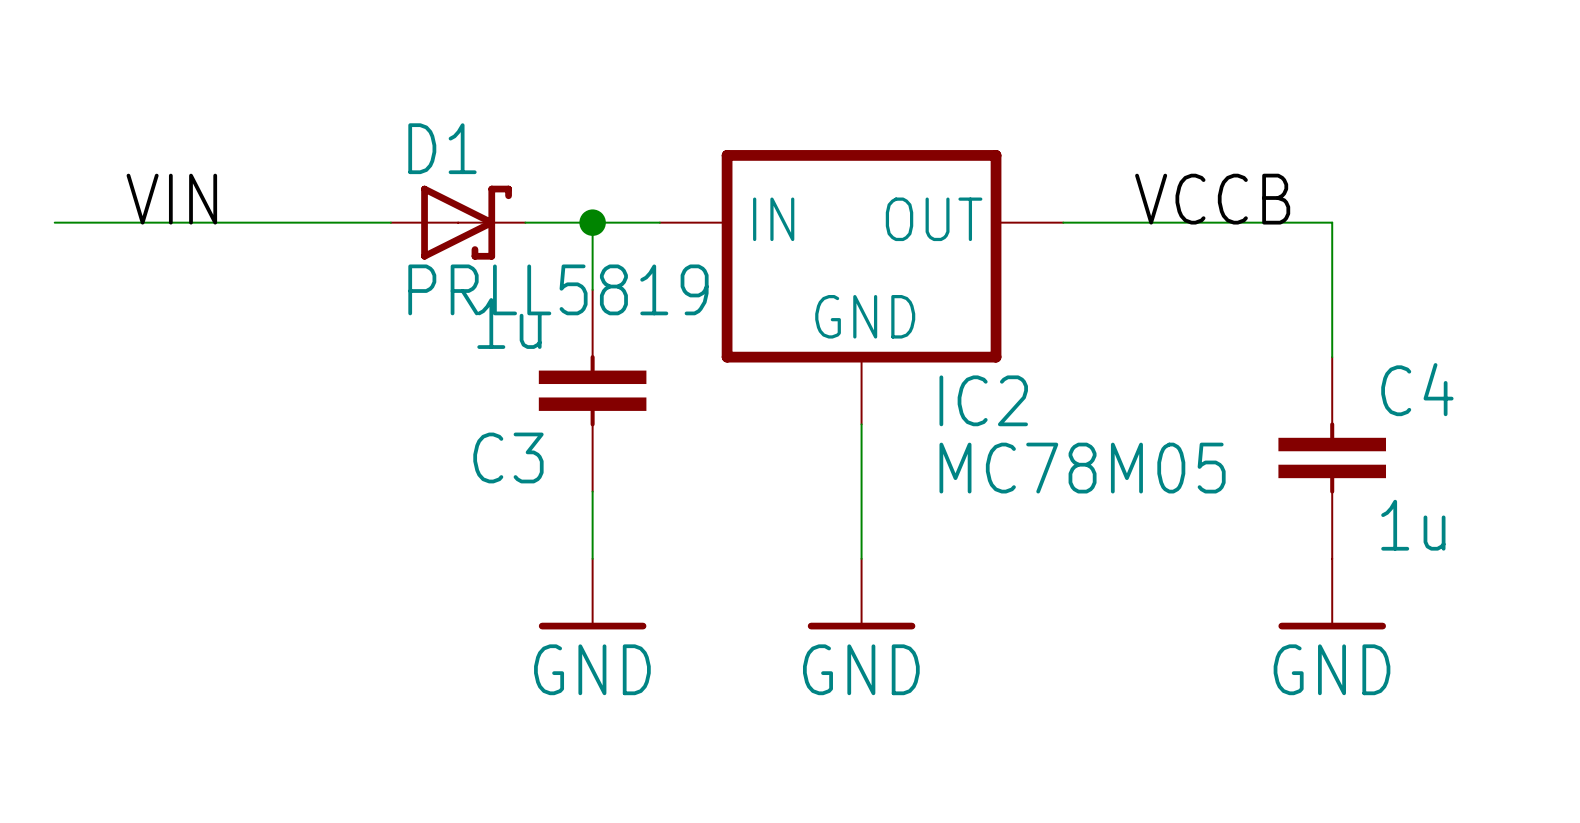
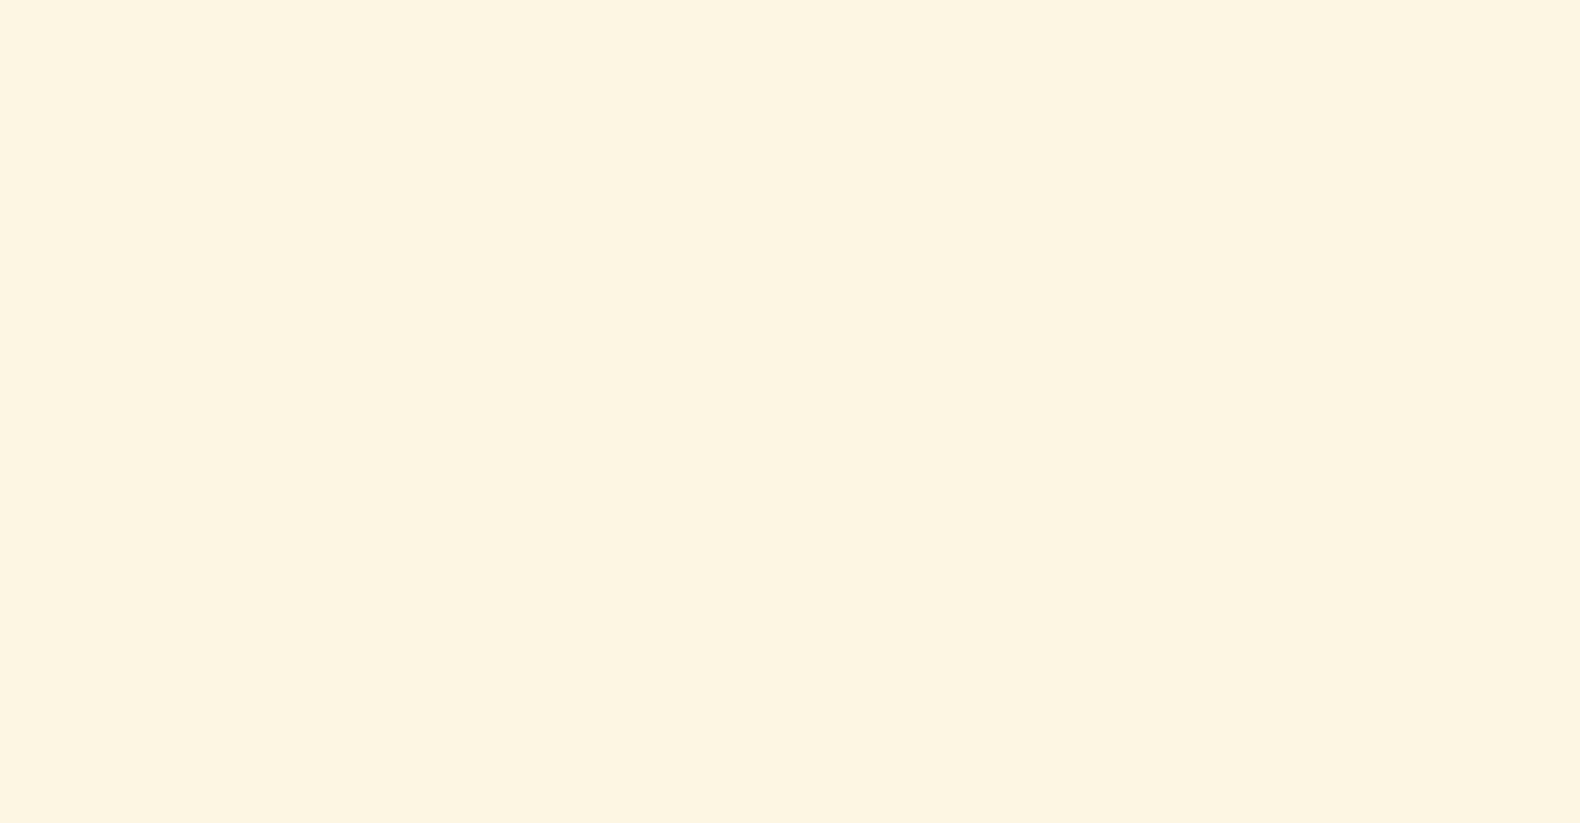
label: VIN (171, 199) -> none
label: VCCB (1212, 199) -> none
wire: (54, 222) (390, 222) -> none
D1: PRLL5819 (458, 222) -> none
wire: (525, 222) (659, 222) -> none
wire: (592, 222) (592, 289) -> none
junction: (592, 222) -> none
wire: (1063, 222) (1332, 222) (1332, 357) -> none
IC2: MC78M05 (861, 287) -> none
C3: 1u (592, 390) -> none
wire: (861, 424) (861, 558) -> none
C4: 1u (1332, 457) -> none
wire: (592, 491) (592, 558) -> none
power symbol: GND (592, 594) -> none
power symbol: GND (861, 594) -> none
power symbol: GND (1332, 594) -> none

